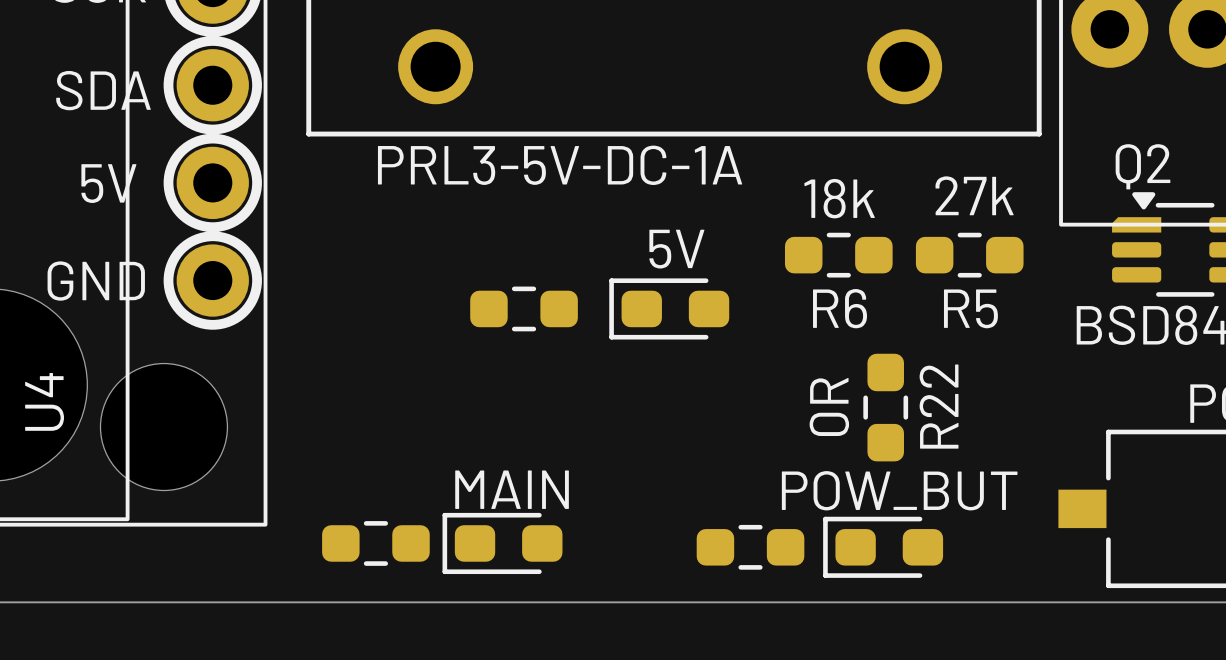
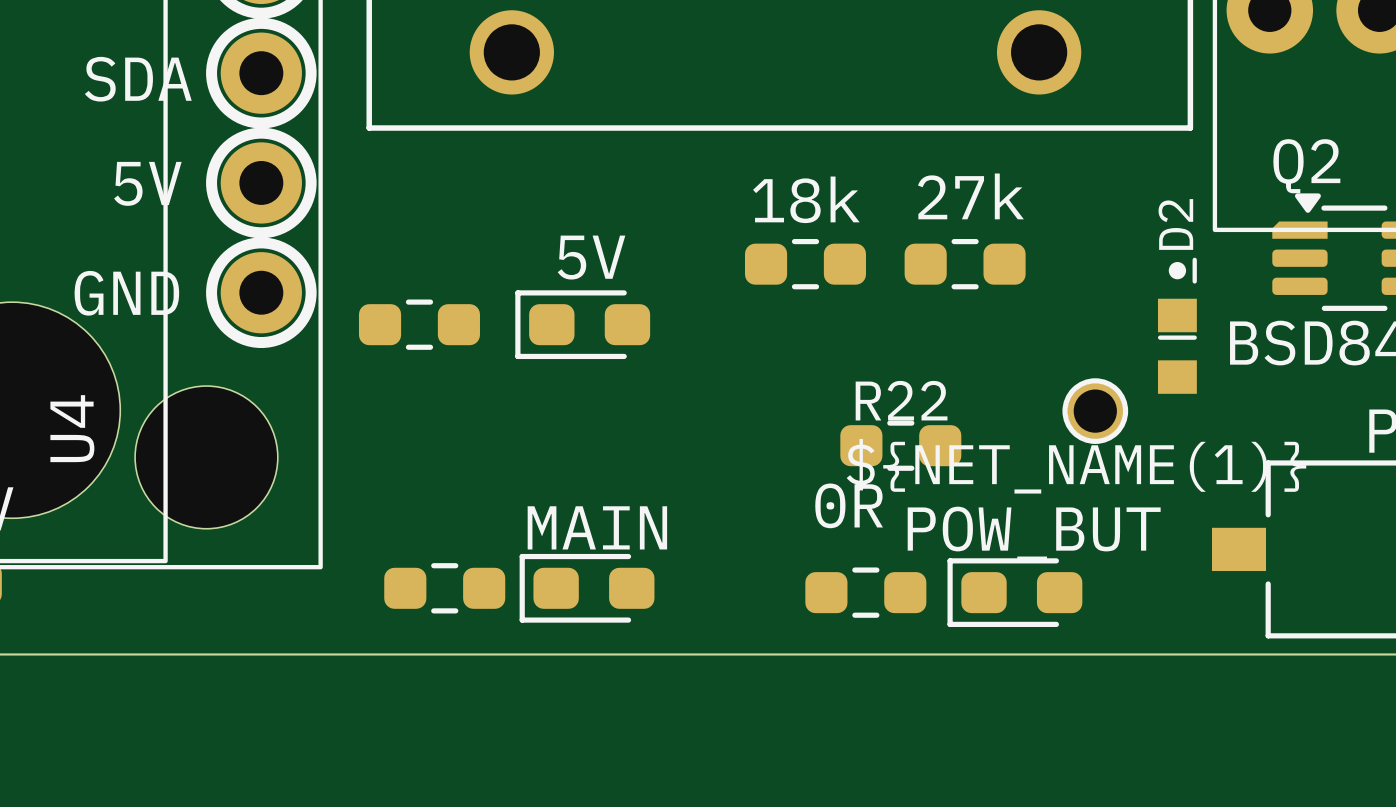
part value: PRL3-5V-DC-1A (560, 165) -> none
R6 value: 18k (839, 198) -> 27k (970, 196)
part value: none -> 5V (591, 257)
part: none -> 18k (805, 264)
R5: 27k (969, 255) -> none
part footprint: [470, 286, 578, 332] -> [515, 290, 651, 360]
part: none -> (419, 324)
part: 5V (669, 308) -> none
R6 name: R6 (840, 308) -> none
D2: none -> (1177, 325)
part: none -> (1095, 411)
R22 rotation: 0° (885, 407) -> 90° clockwise (900, 445)
R22 position: (885, 407) -> (900, 445)

